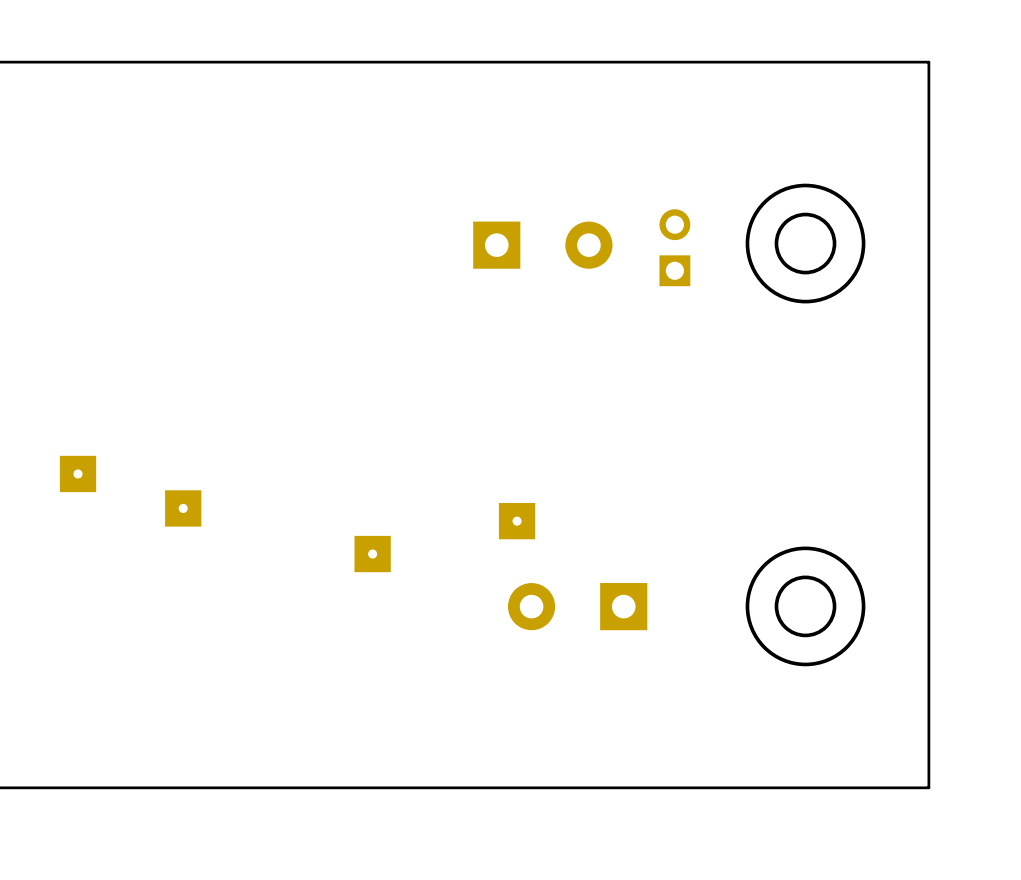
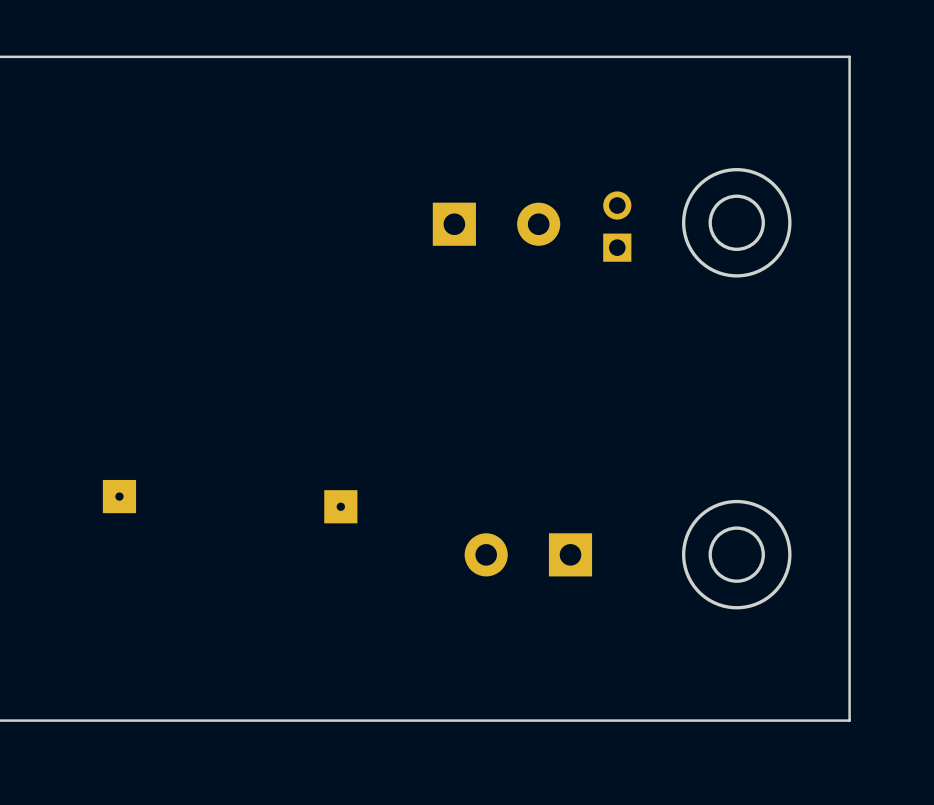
part: (78, 473) -> none
part: (183, 508) -> none
part: (517, 521) -> none
part: none -> (119, 496)

